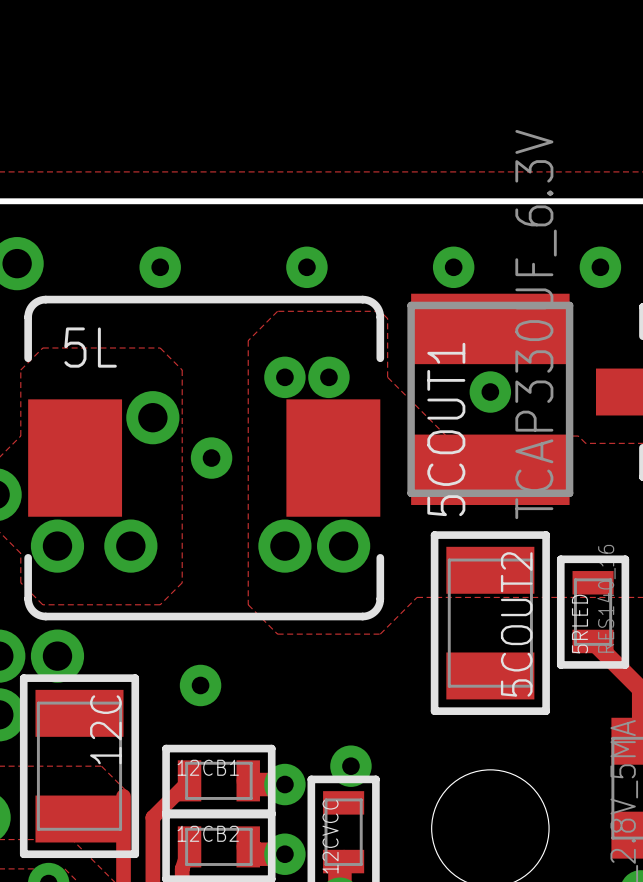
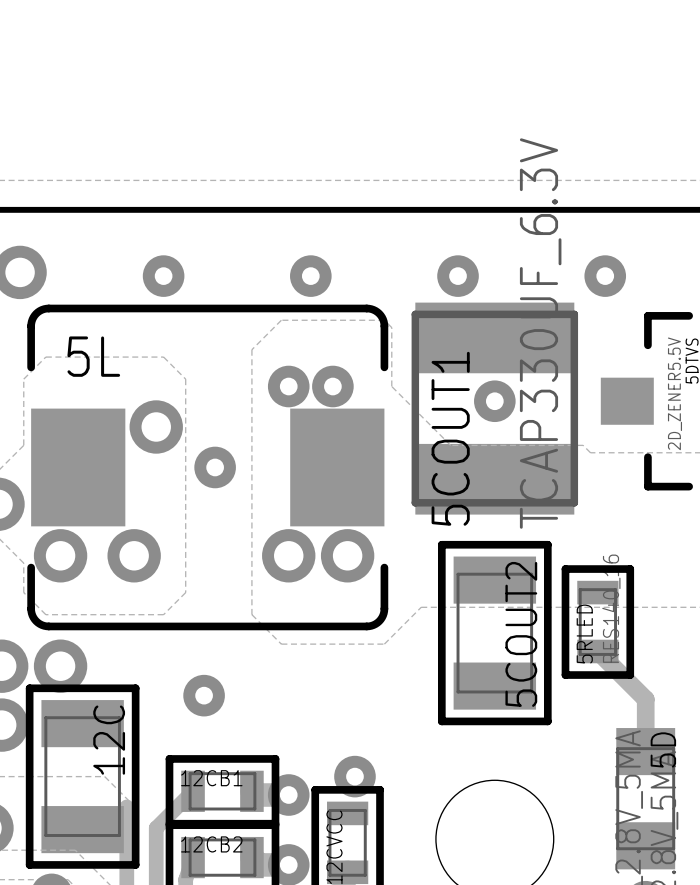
5COUT2 footprint: [430, 531, 550, 715] -> [438, 540, 552, 726]
12C footprint: [19, 674, 140, 859] -> [25, 684, 140, 869]

